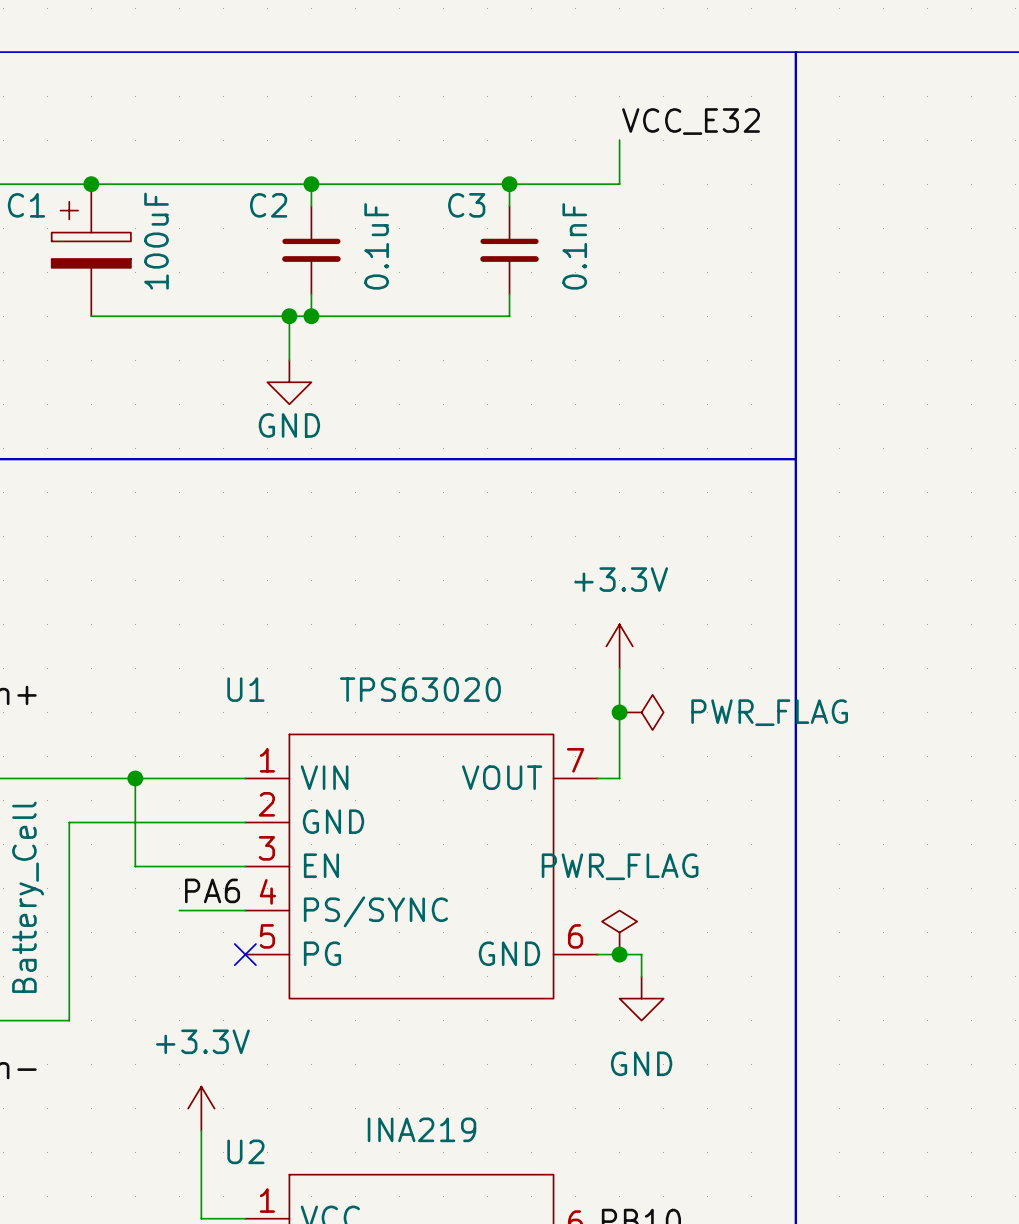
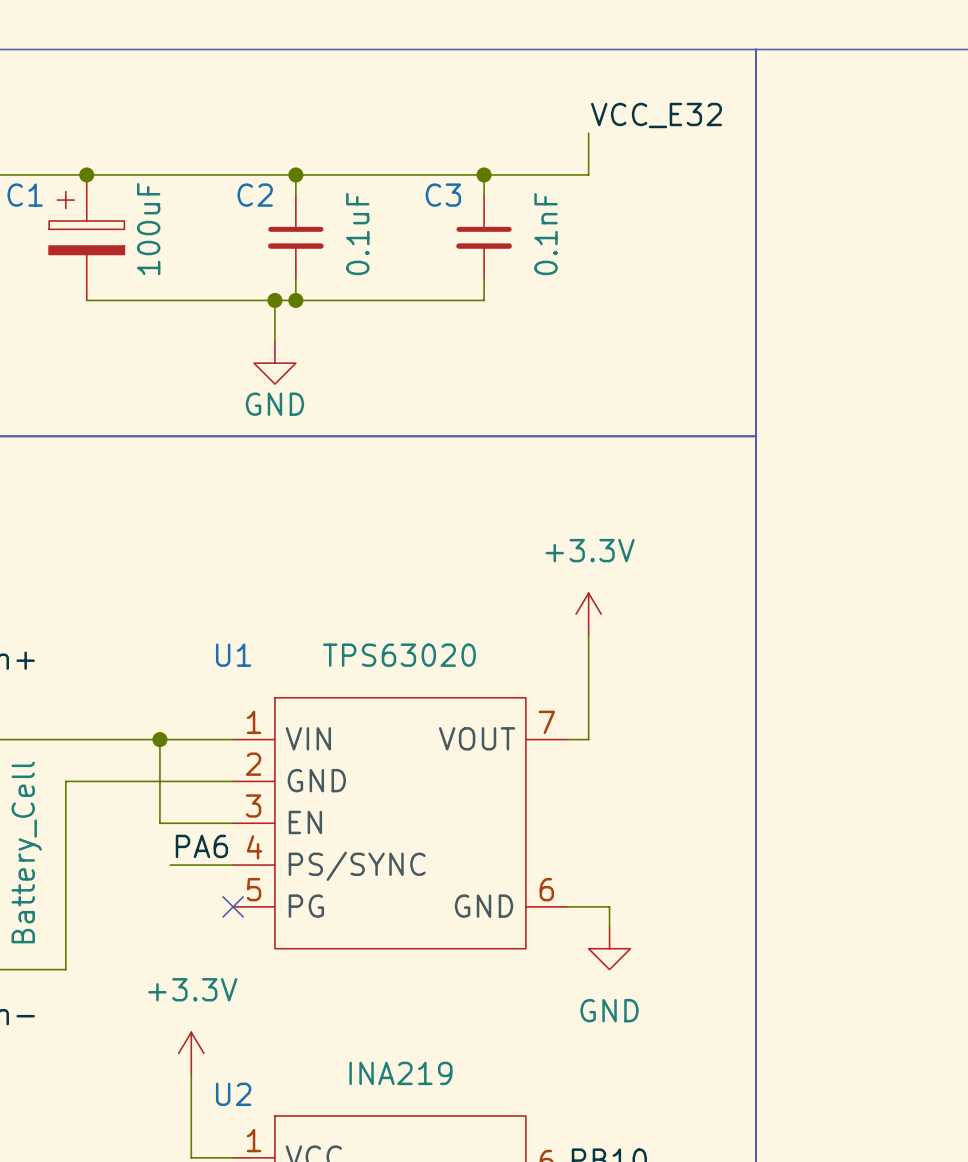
junction: (619, 712) -> none
power symbol: PWR_FLAG (641, 712) -> none
wire: (135, 778) (135, 866) (168, 866) -> (159, 739) (159, 823)
junction position: (135, 778) -> (159, 739)
power symbol: PWR_FLAG (619, 932) -> none
junction: (619, 954) -> none

